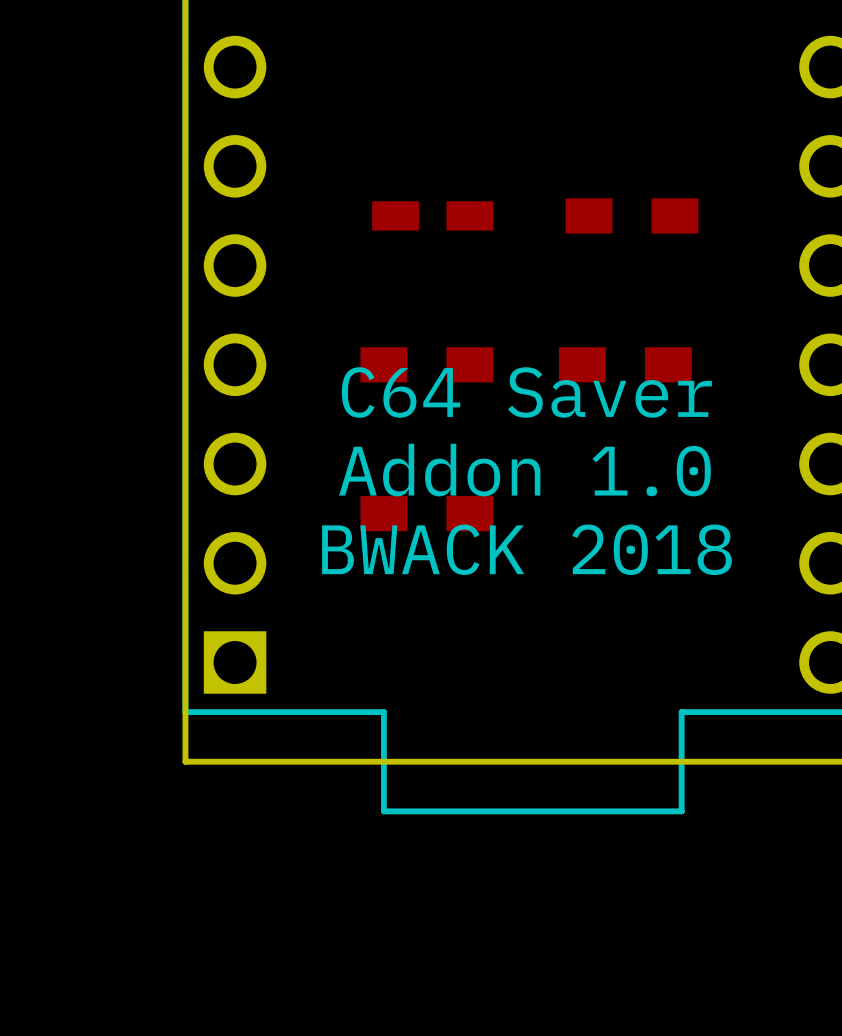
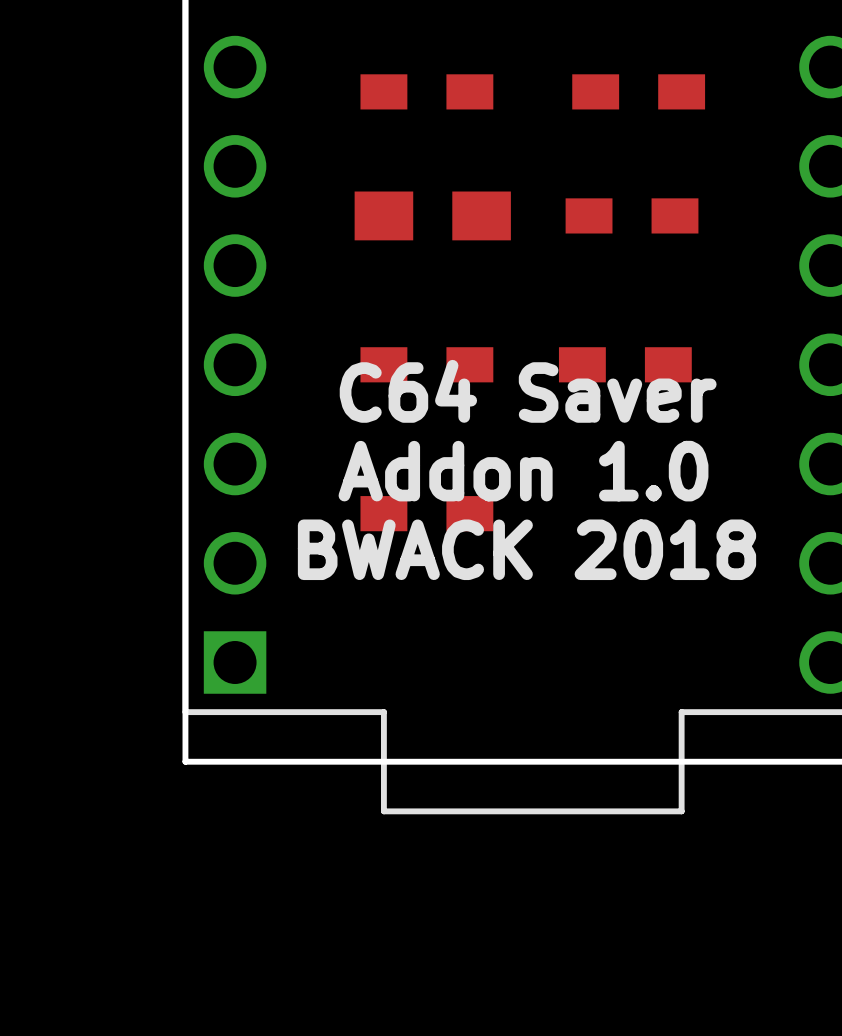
part: none -> (426, 91)
part: none -> (638, 91)
part footprint: [372, 201, 494, 231] -> [354, 191, 511, 241]

